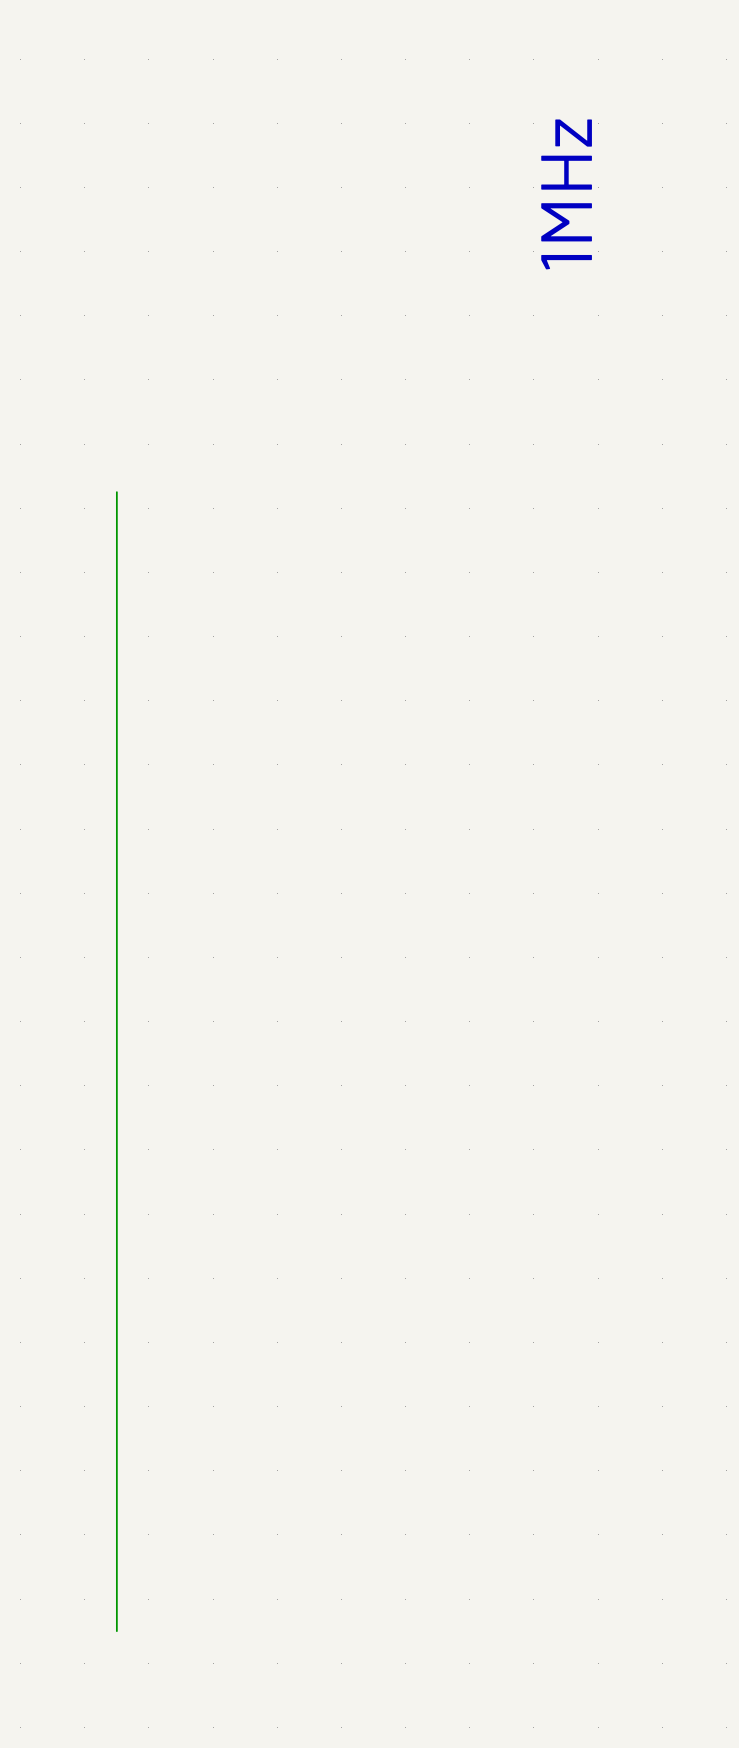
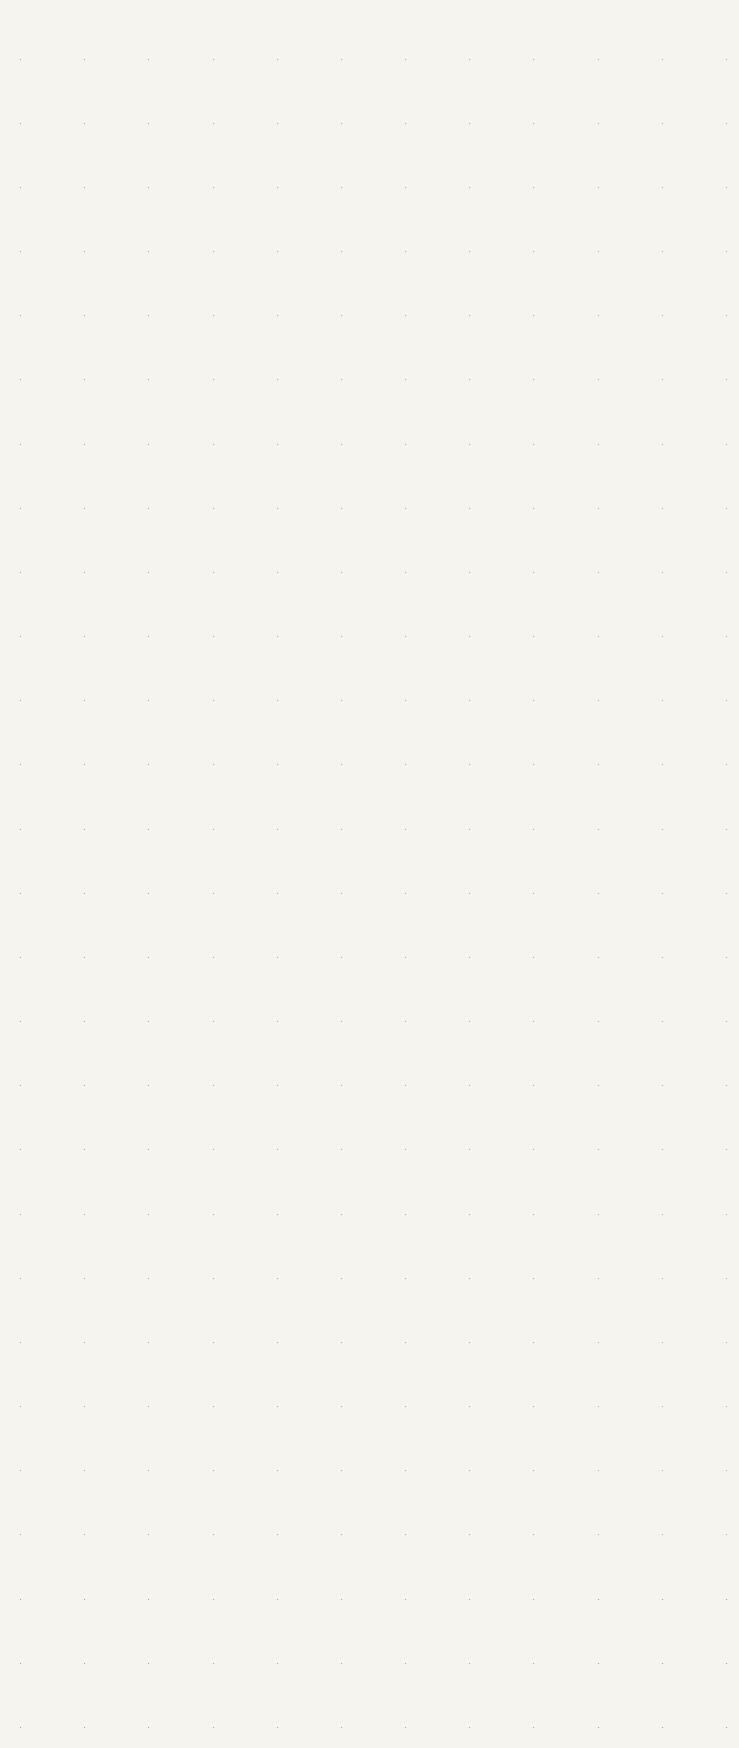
text: 1MHz (566, 194) -> none
wire: (116, 492) (116, 1631) -> none

